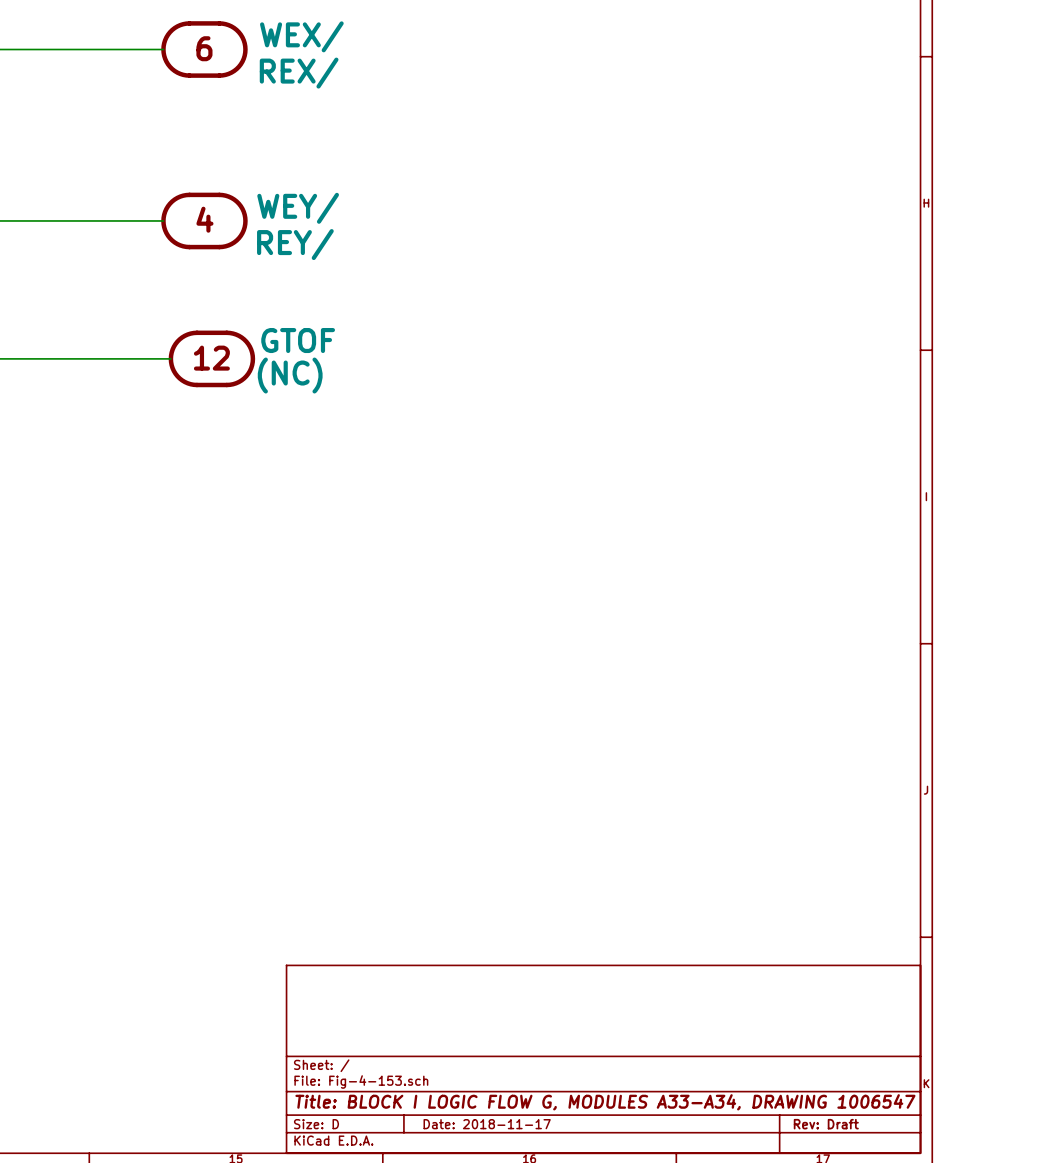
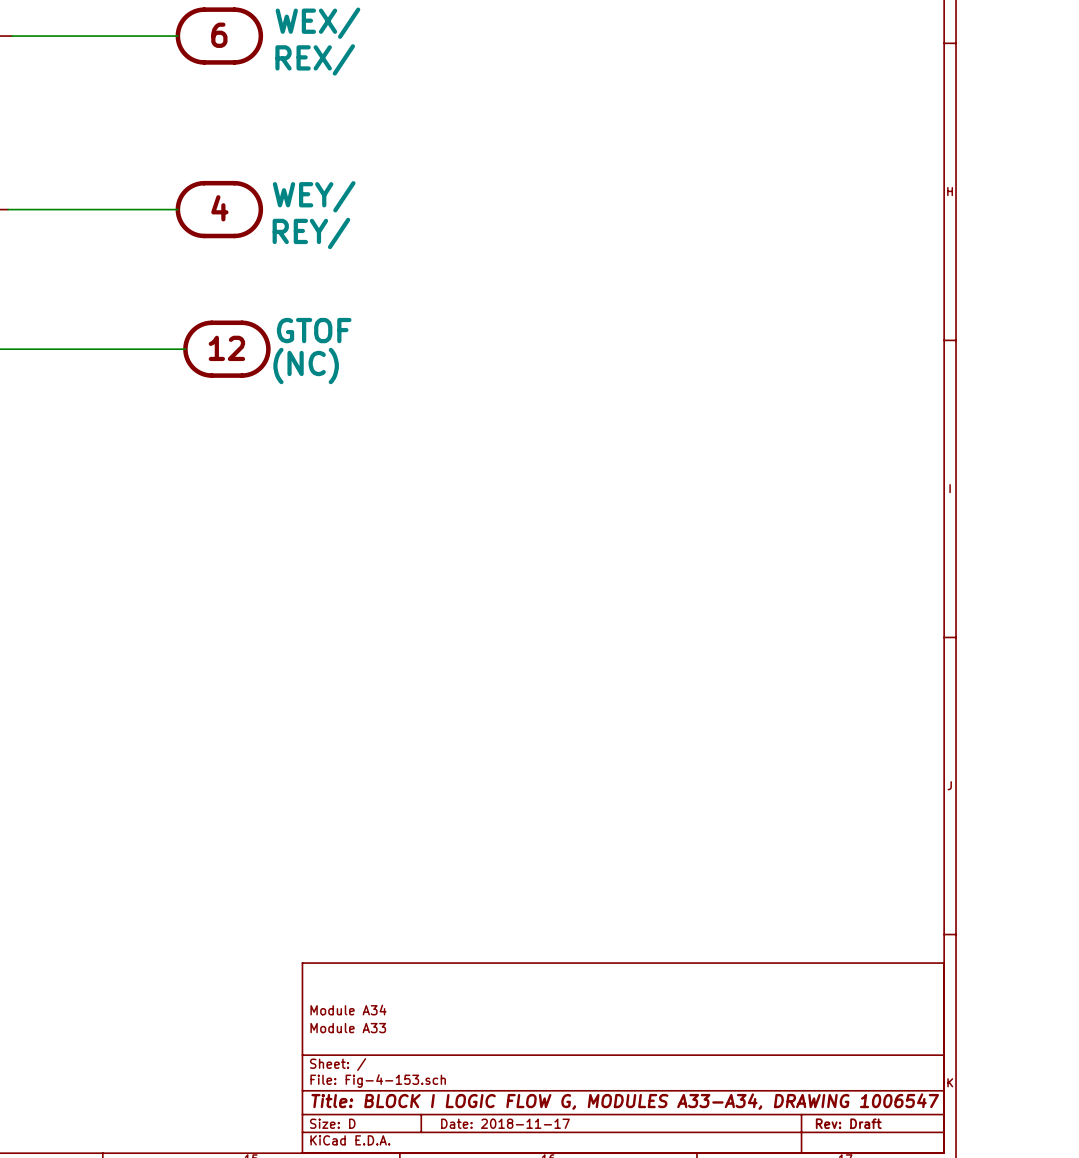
title block: none -> Module A34 (348, 1010)
title block: none -> Module A33 (348, 1028)

